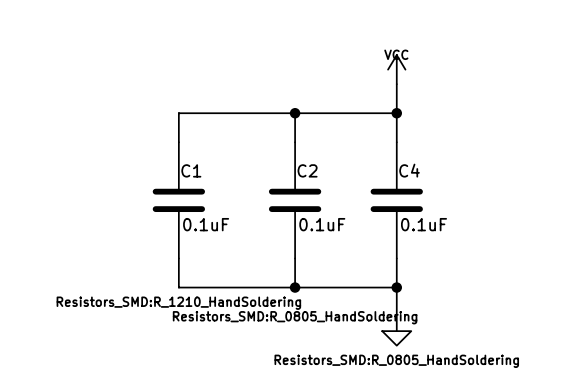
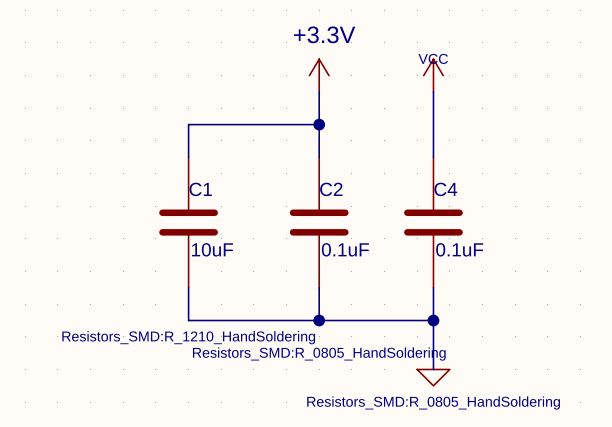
power symbol: none -> +3.3V (319, 75)
wire: (295, 113) (396, 113) -> (319, 124) (319, 91)
junction: (396, 113) -> none
C1 value: 0.1uF (206, 224) -> 10uF (212, 249)

